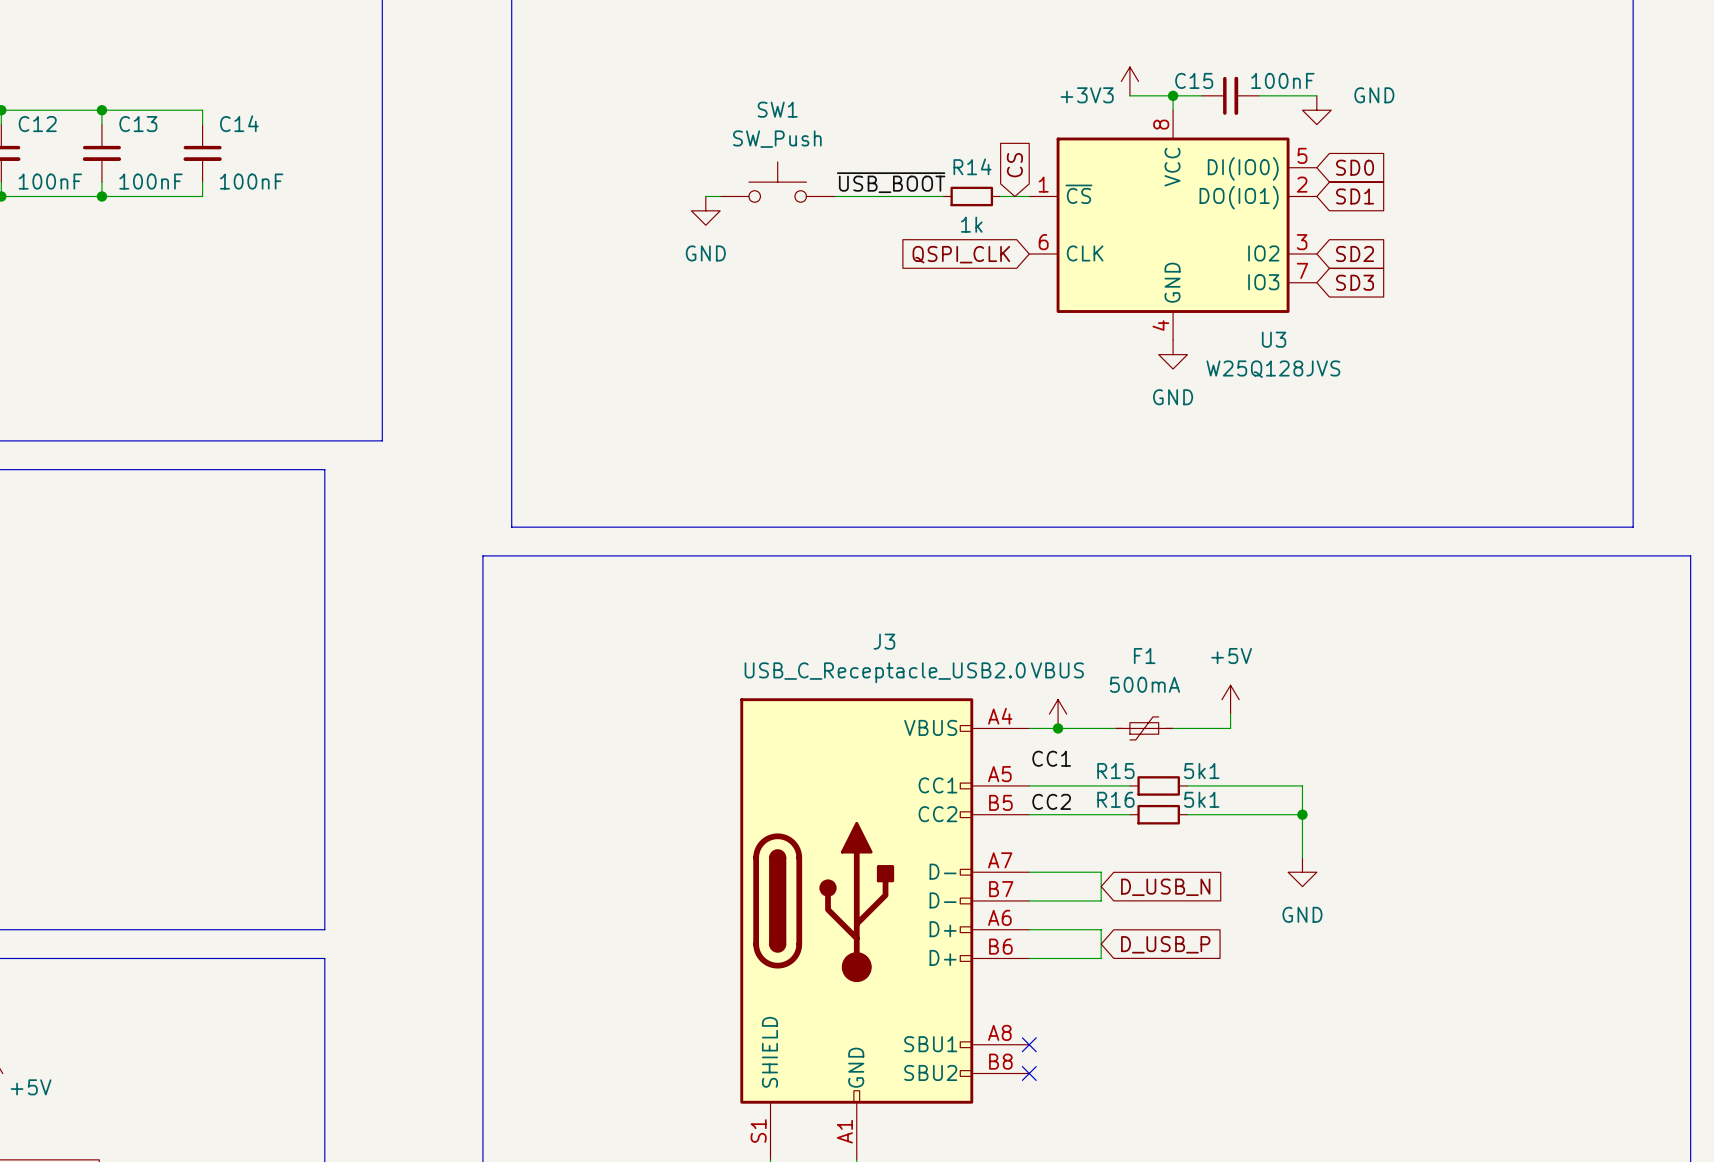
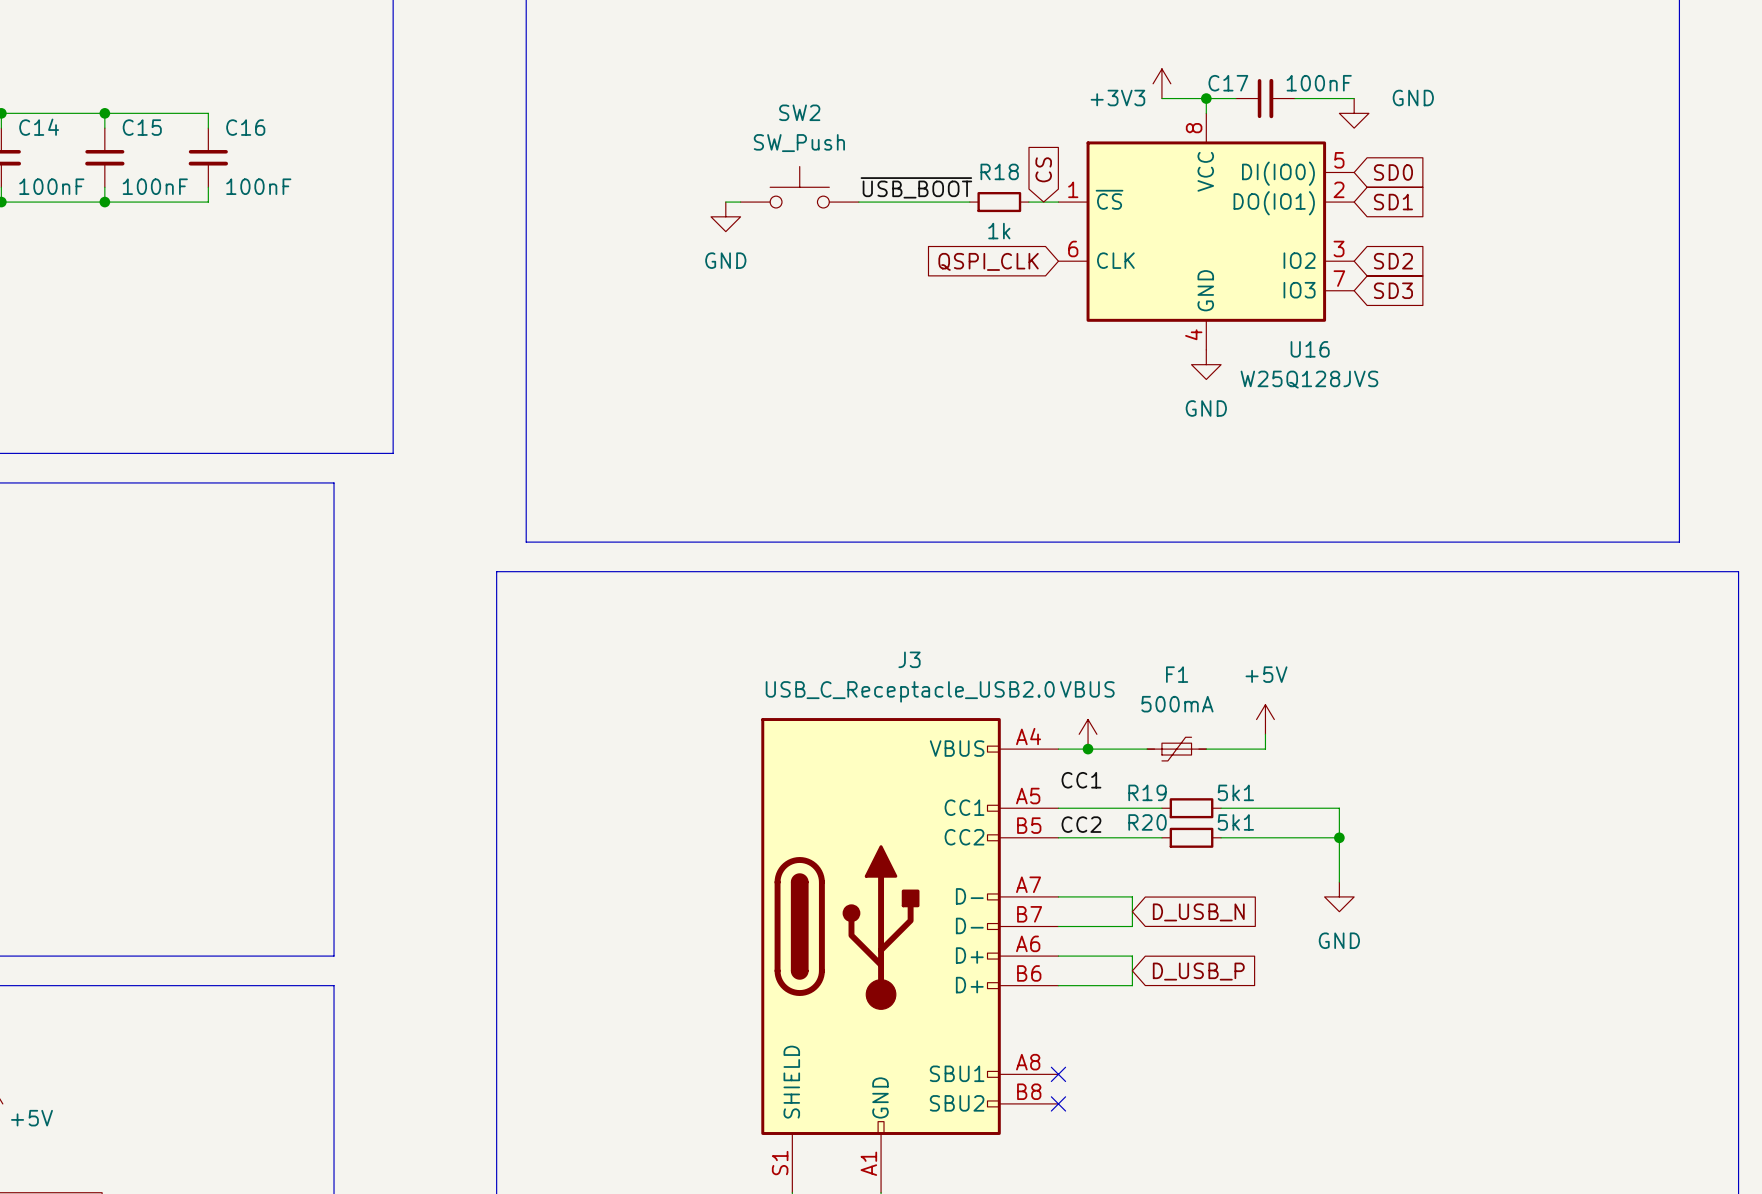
C15 name: C15 (1194, 80) -> C17 (1228, 83)
SW1 name: SW1 (777, 109) -> SW2 (799, 112)
C14 name: C14 (239, 123) -> C16 (245, 127)
C12 name: C12 (37, 124) -> C14 (39, 127)
C13 name: C13 (138, 124) -> C15 (142, 127)
R14 name: R14 (972, 166) -> R18 (999, 171)
U3 name: U3 (1274, 339) -> U16 (1310, 349)
R15 name: R15 (1115, 771) -> R19 (1147, 792)
R16 name: R16 (1115, 799) -> R20 (1147, 822)

